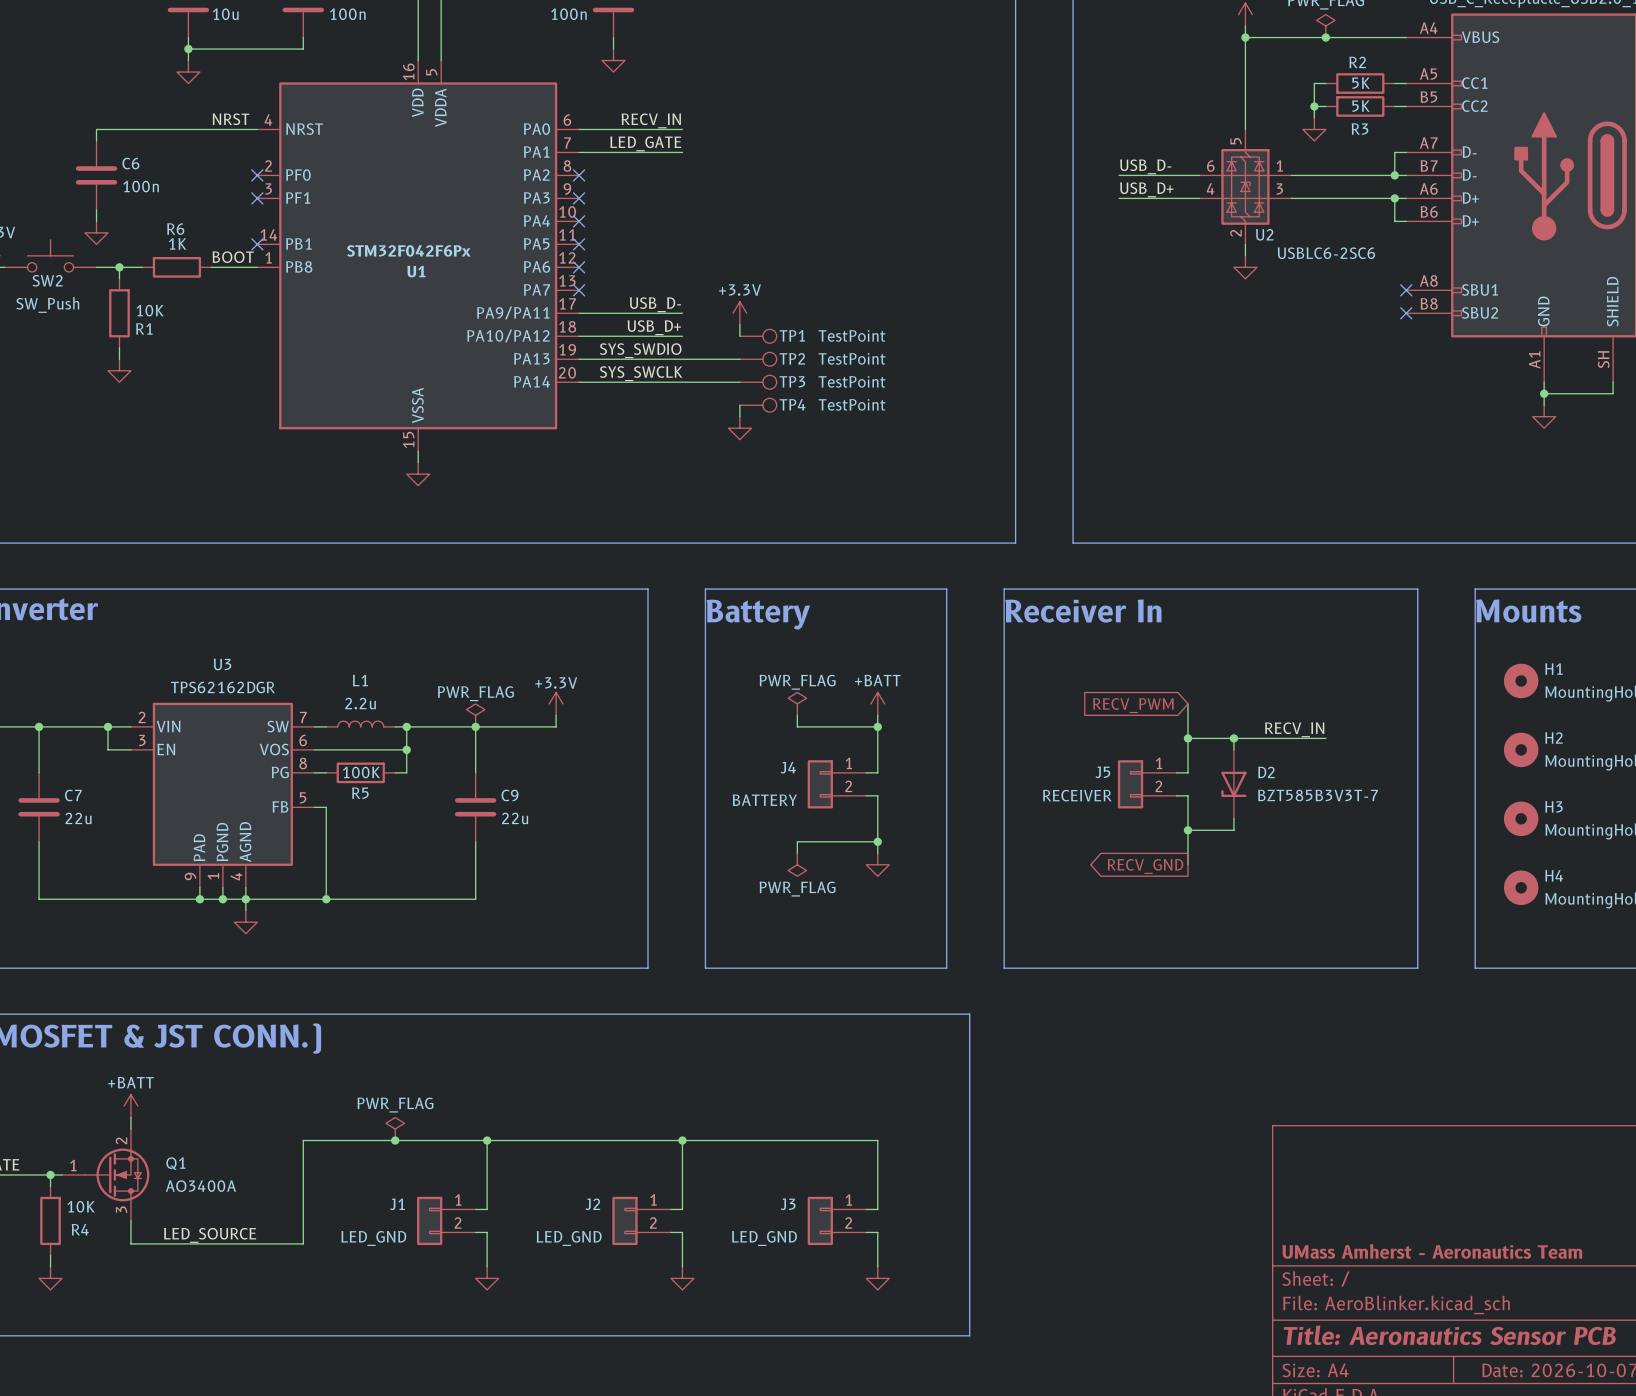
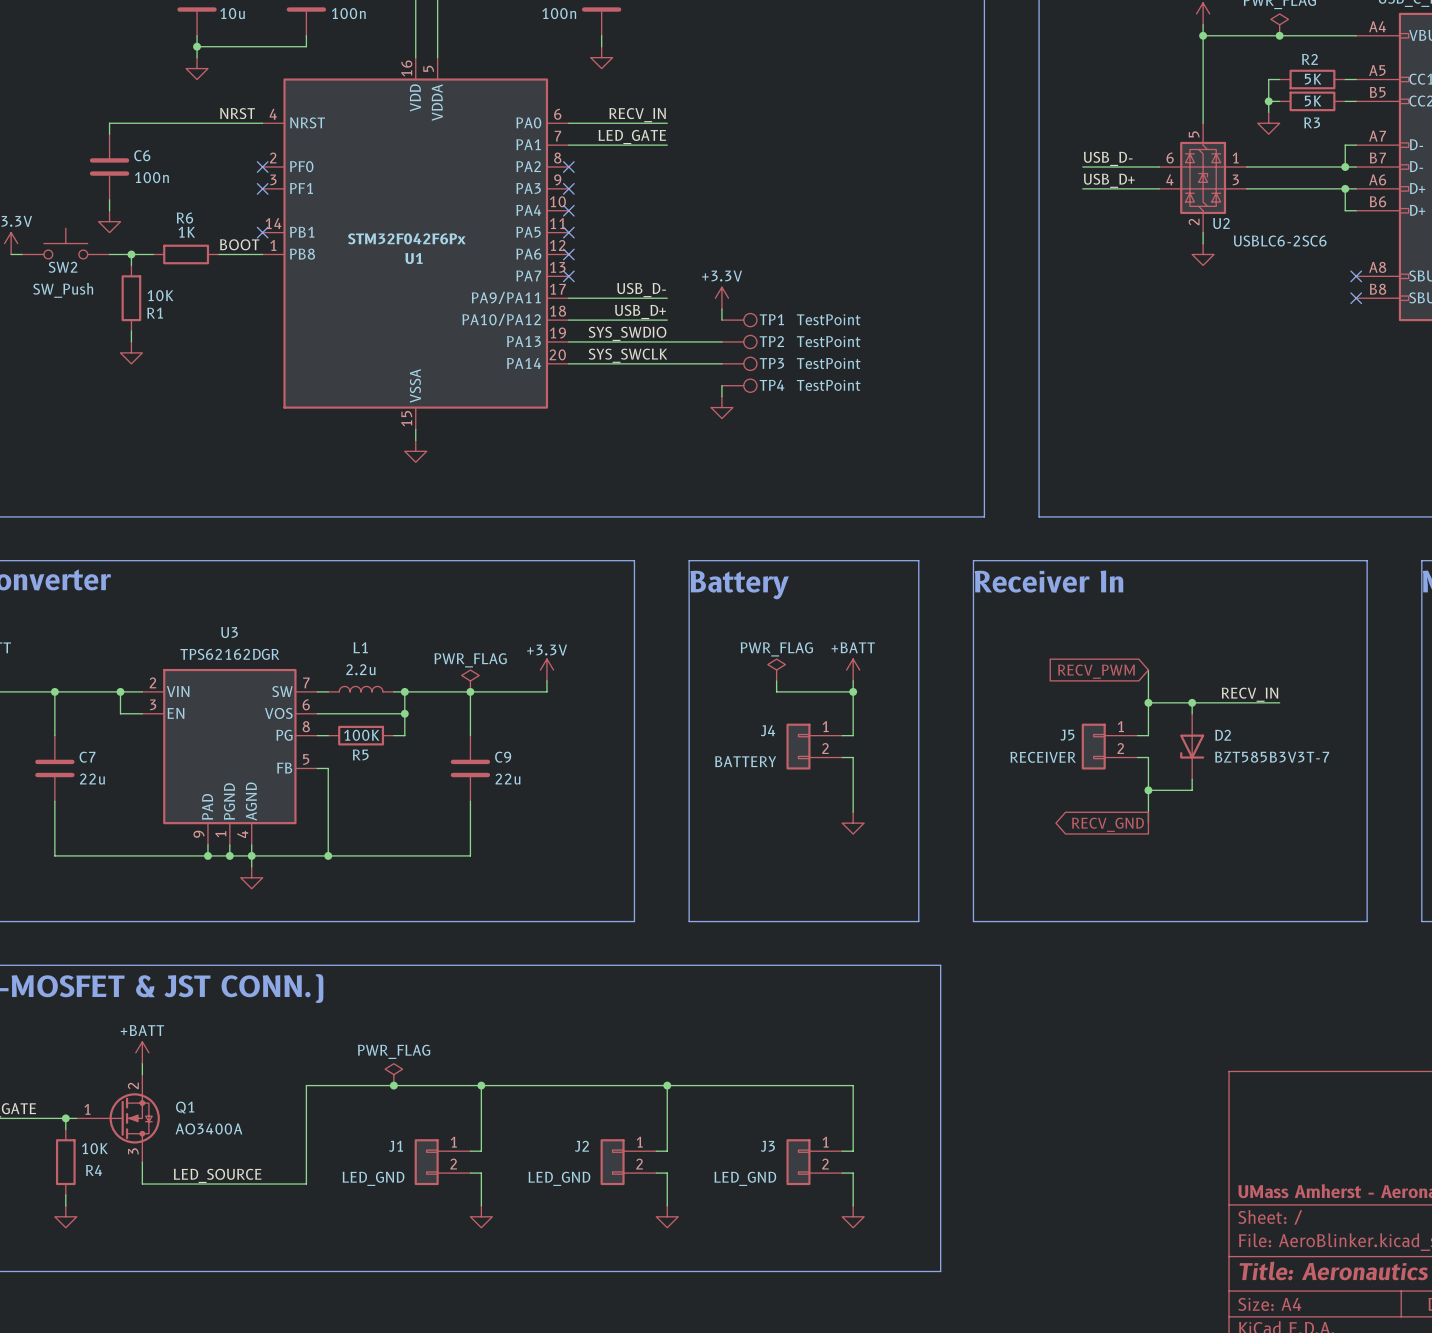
wire: (877, 841) (797, 841) (797, 853) -> none
junction: (877, 841) -> none
power symbol: PWR_FLAG (797, 864) -> none

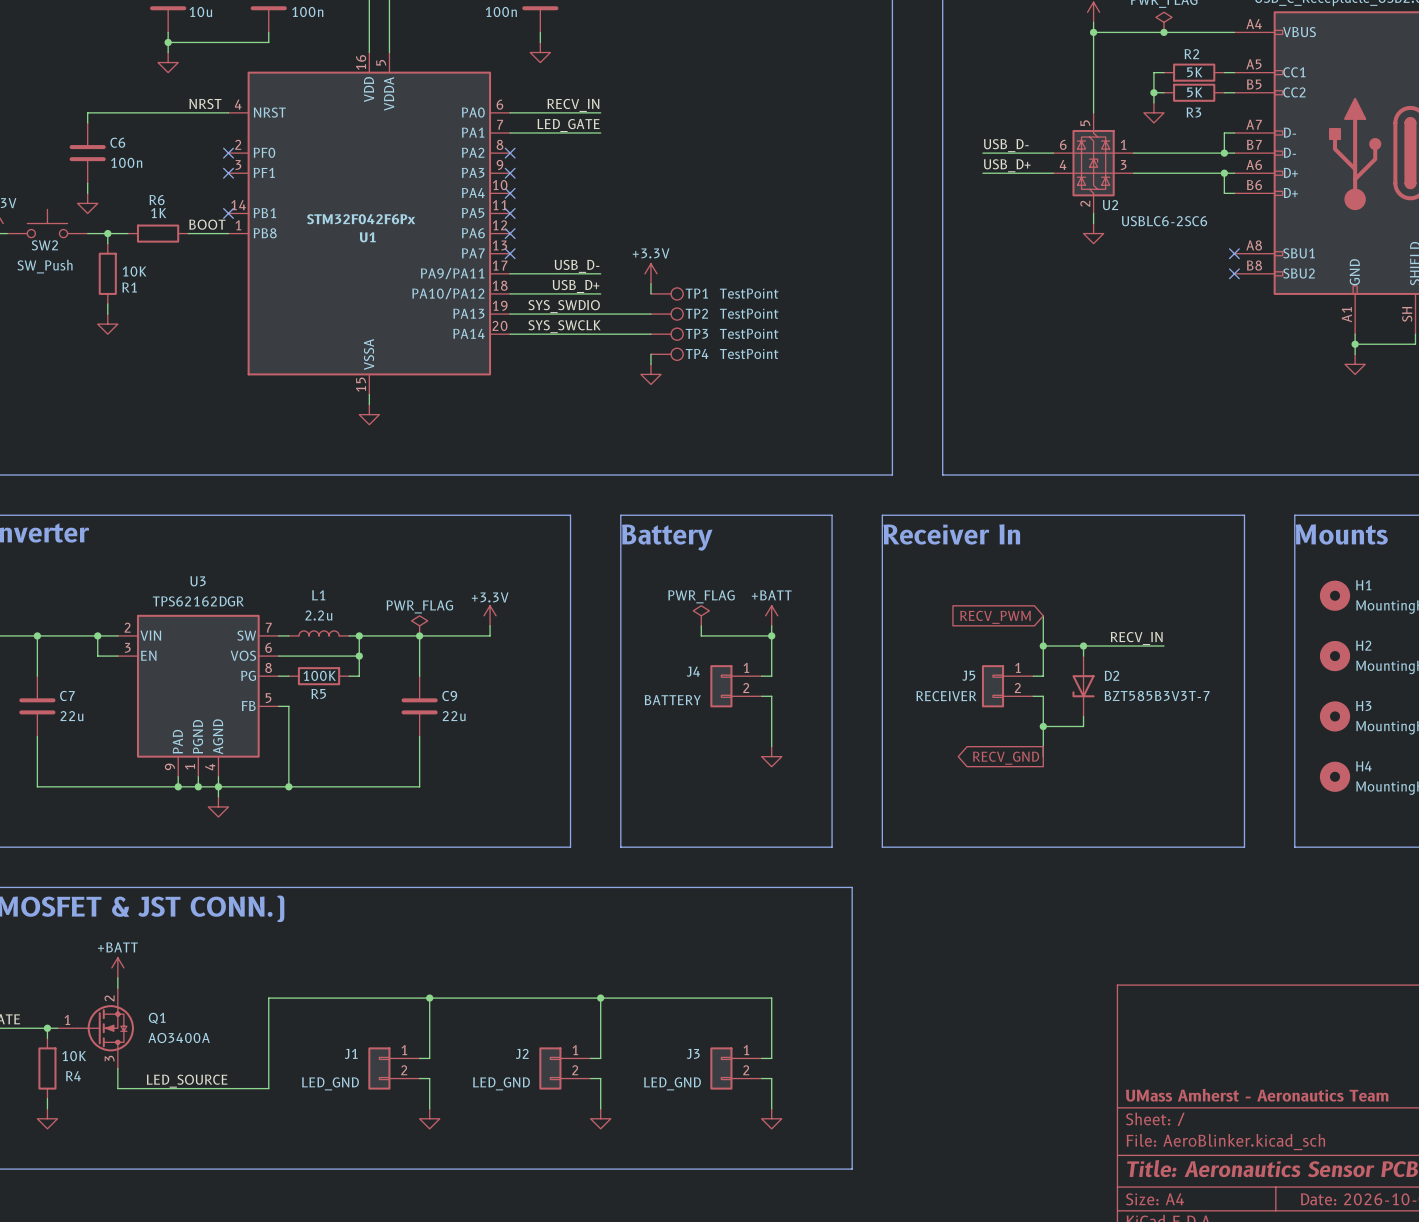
power symbol: PWR_FLAG (393, 1074) -> none
junction: (393, 1085) -> none

